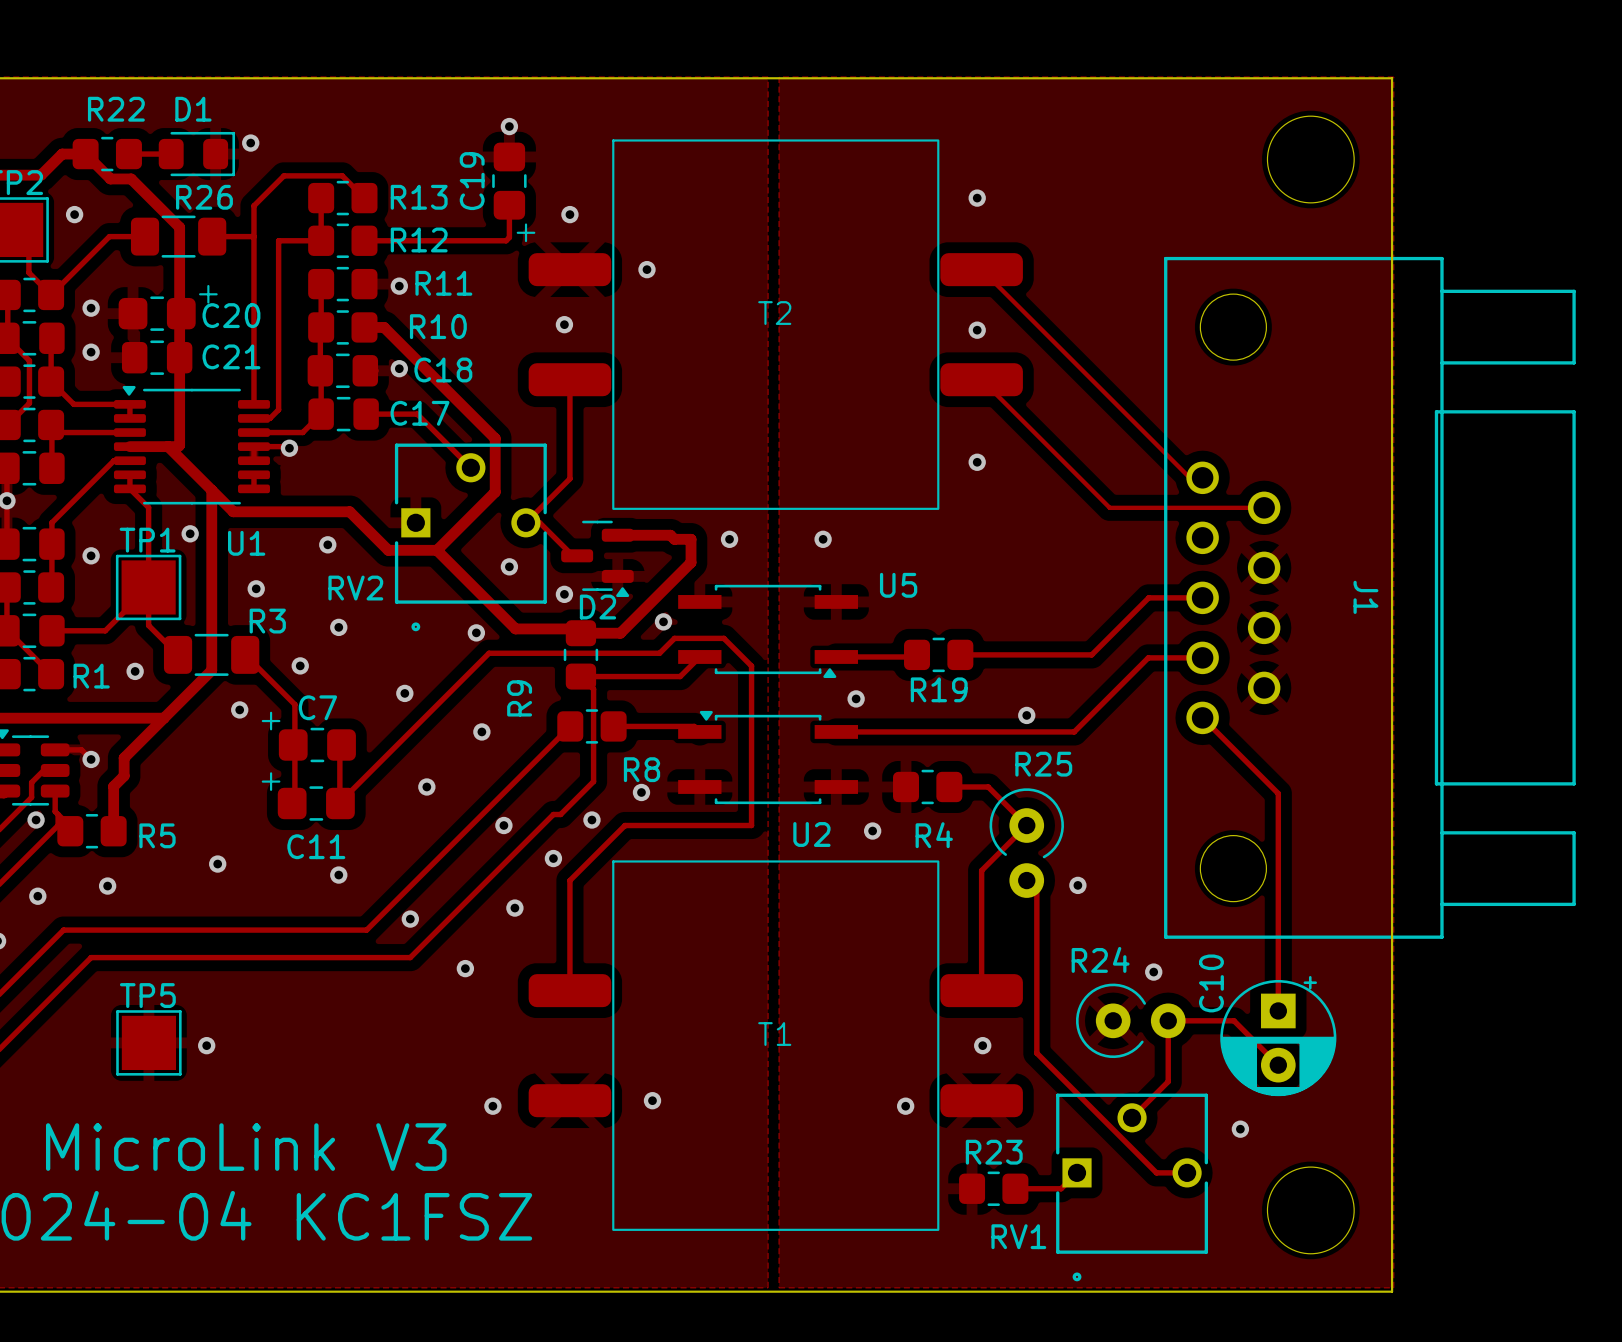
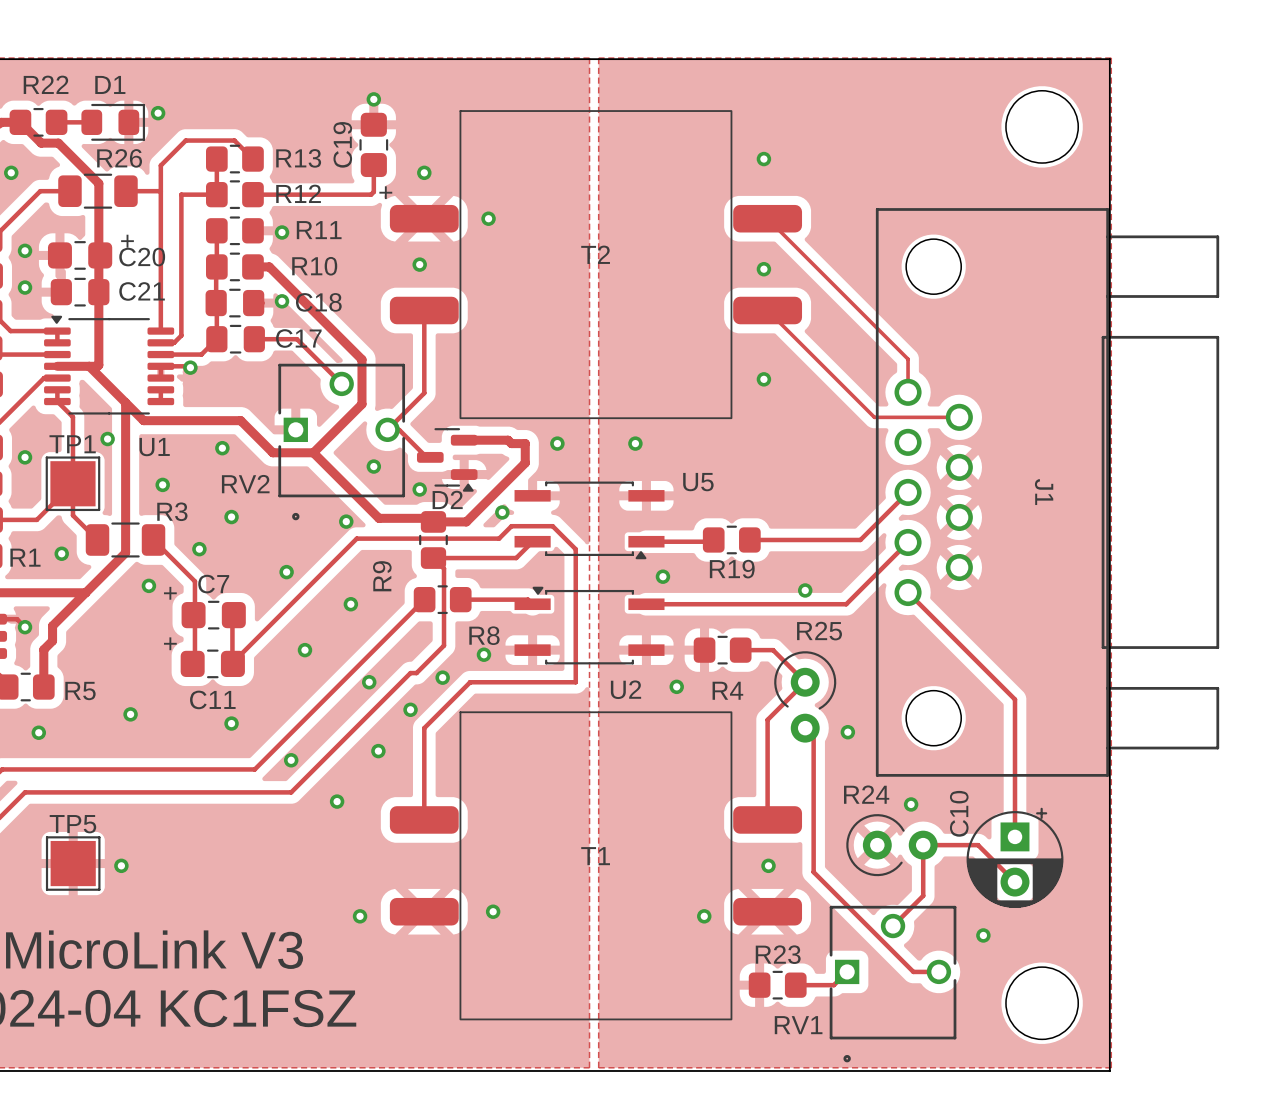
track: (1150, 438) (1189, 477) (1202, 477) -> (908, 359) (908, 392)
track: (1211, 507) (1264, 507) -> none
track: (1202, 597) (1148, 597) (1091, 654) -> (908, 492) (859, 539)
J1 position: (1369, 597) -> (1047, 492)
track: (1202, 657) (1148, 657) (1074, 731) -> (908, 542) (844, 604)
track: (1202, 717) (1278, 793) (1278, 846) -> (908, 592) (1015, 699)

